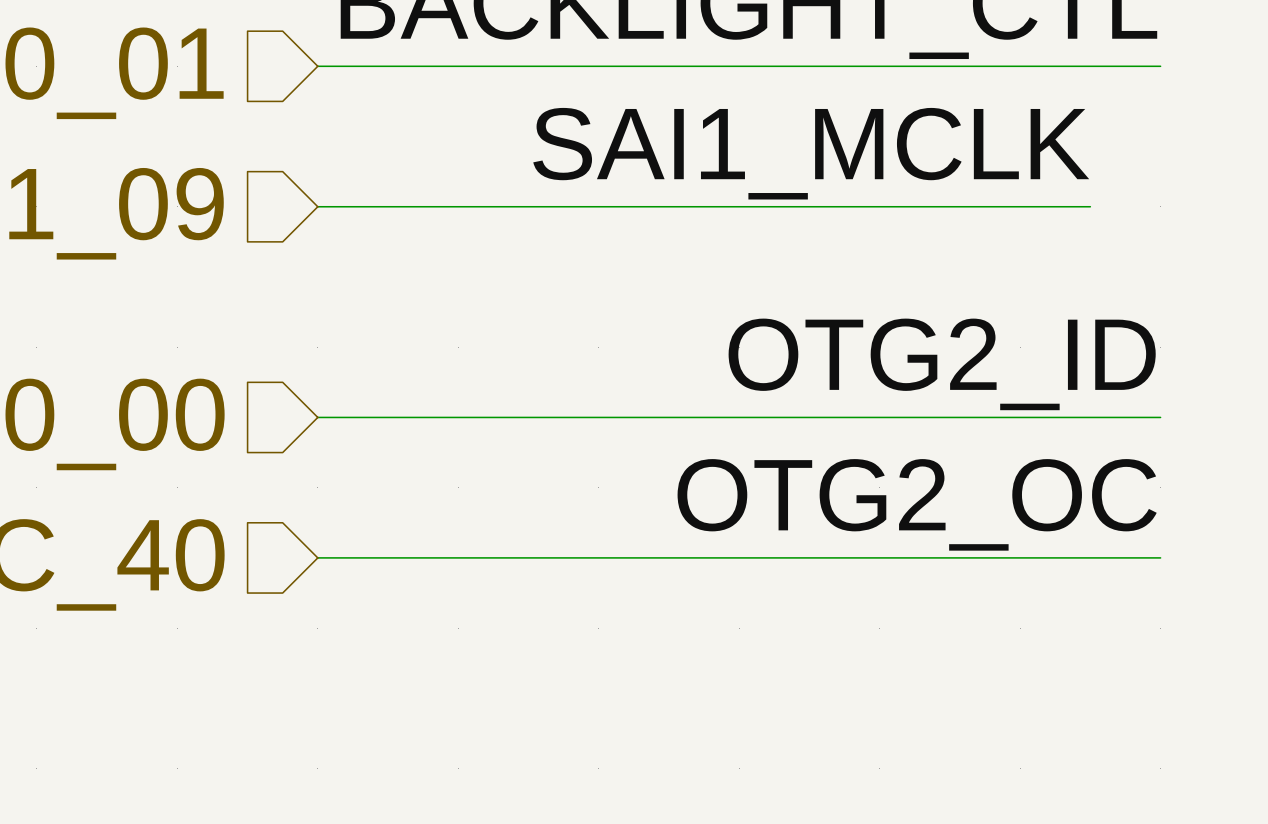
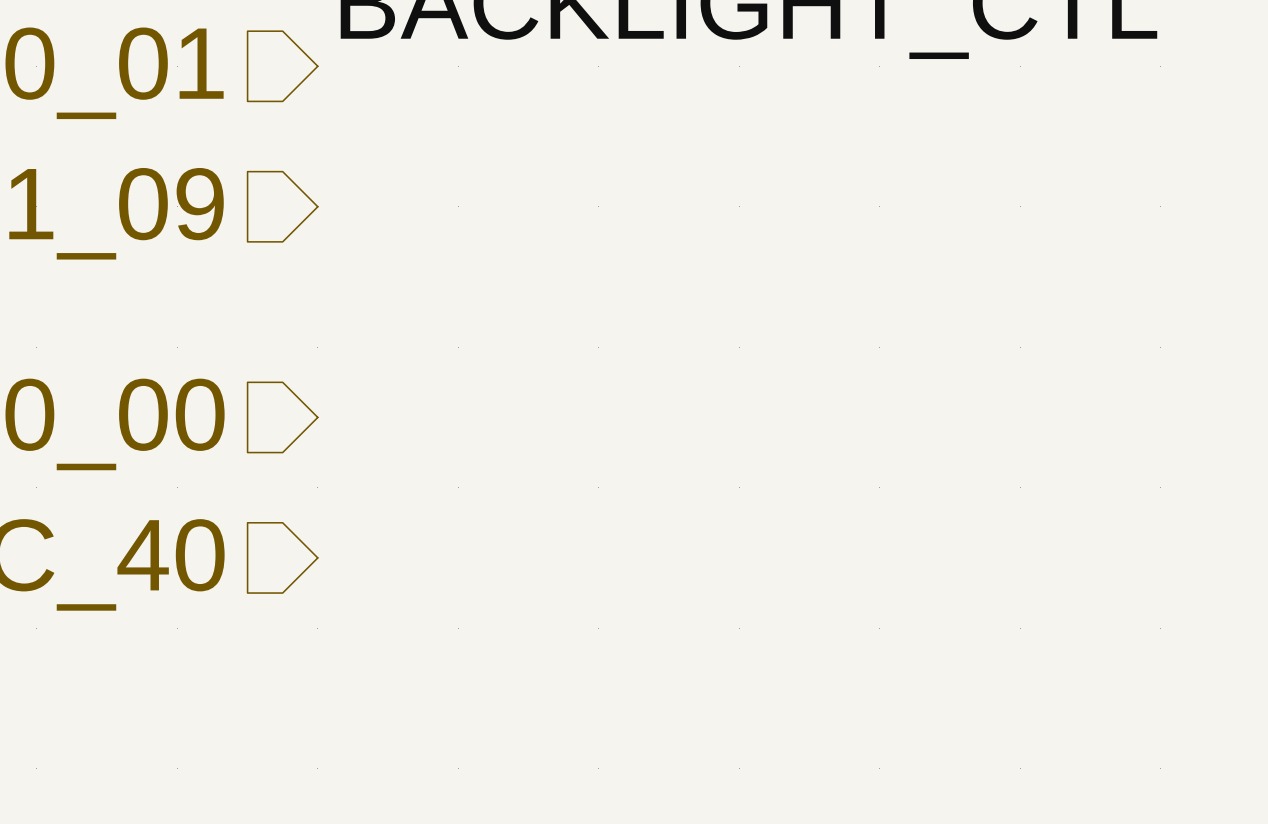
wire: (317, 66) (1160, 66) -> none
label: SAI1_MCLK (811, 153) -> none
wire: (317, 206) (1090, 206) -> none
label: OTG2_ID (942, 364) -> none
wire: (317, 417) (1160, 417) -> none
label: OTG2_OC (917, 504) -> none
wire: (317, 557) (1160, 557) -> none

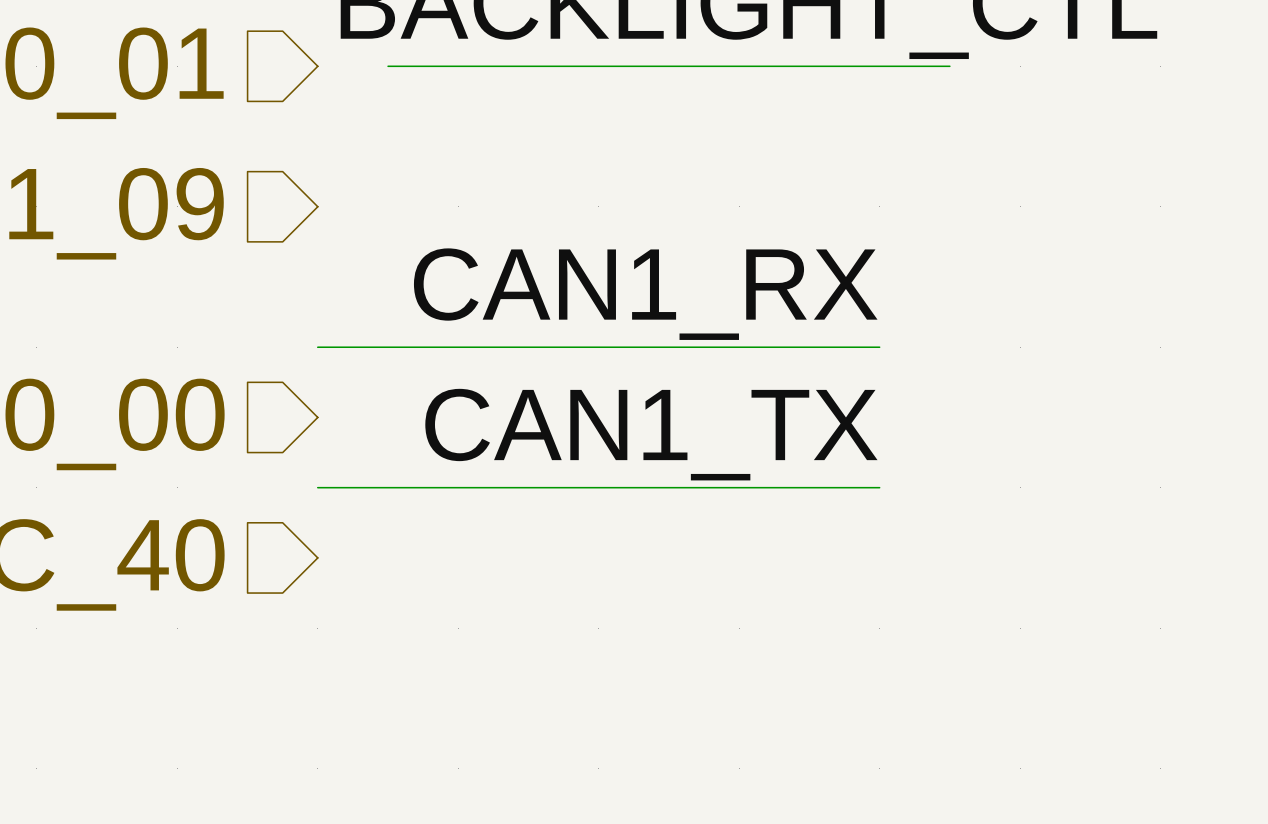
wire: none -> (388, 66) (949, 66)
label: none -> CAN1_RX (645, 294)
wire: none -> (317, 347) (879, 347)
label: none -> CAN1_TX (651, 434)
wire: none -> (317, 487) (879, 487)

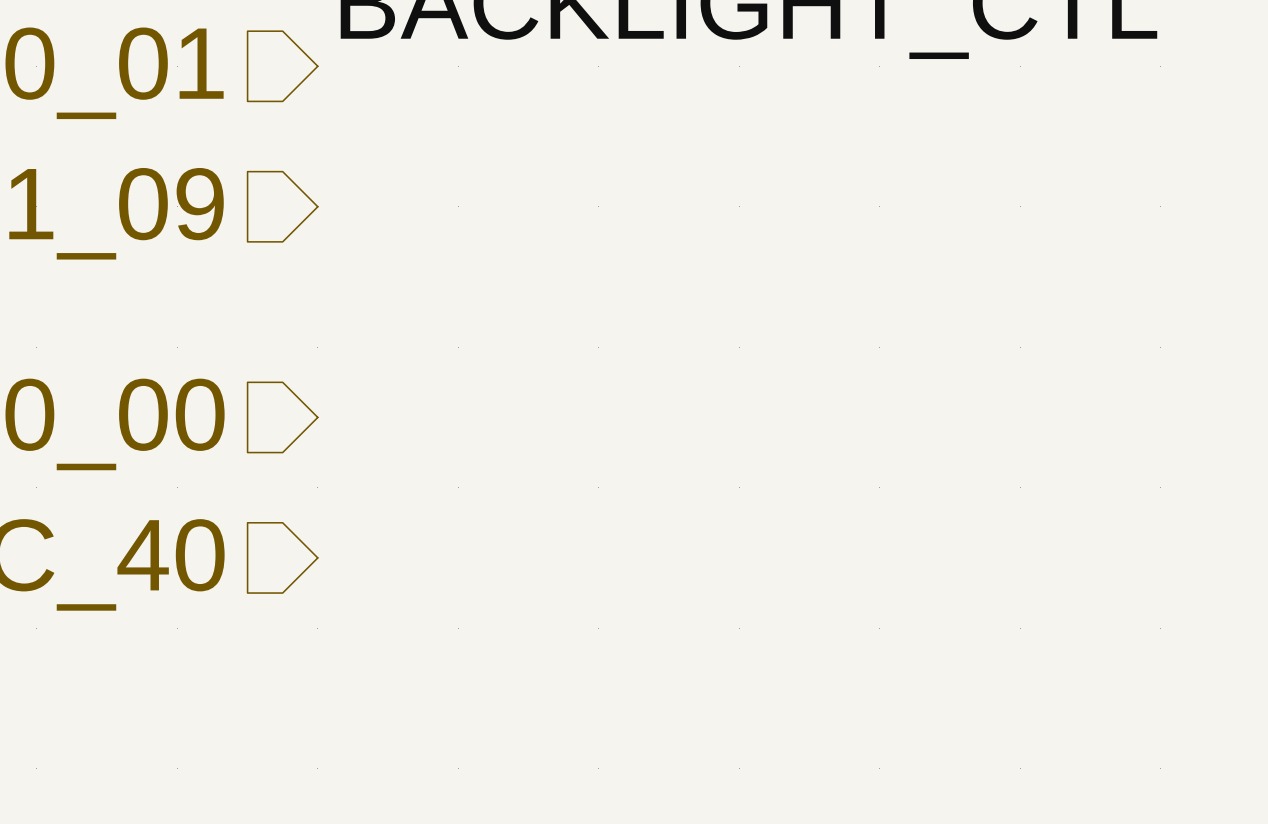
wire: (388, 66) (949, 66) -> none
label: CAN1_RX (645, 294) -> none
wire: (317, 347) (879, 347) -> none
label: CAN1_TX (651, 434) -> none
wire: (317, 487) (879, 487) -> none

